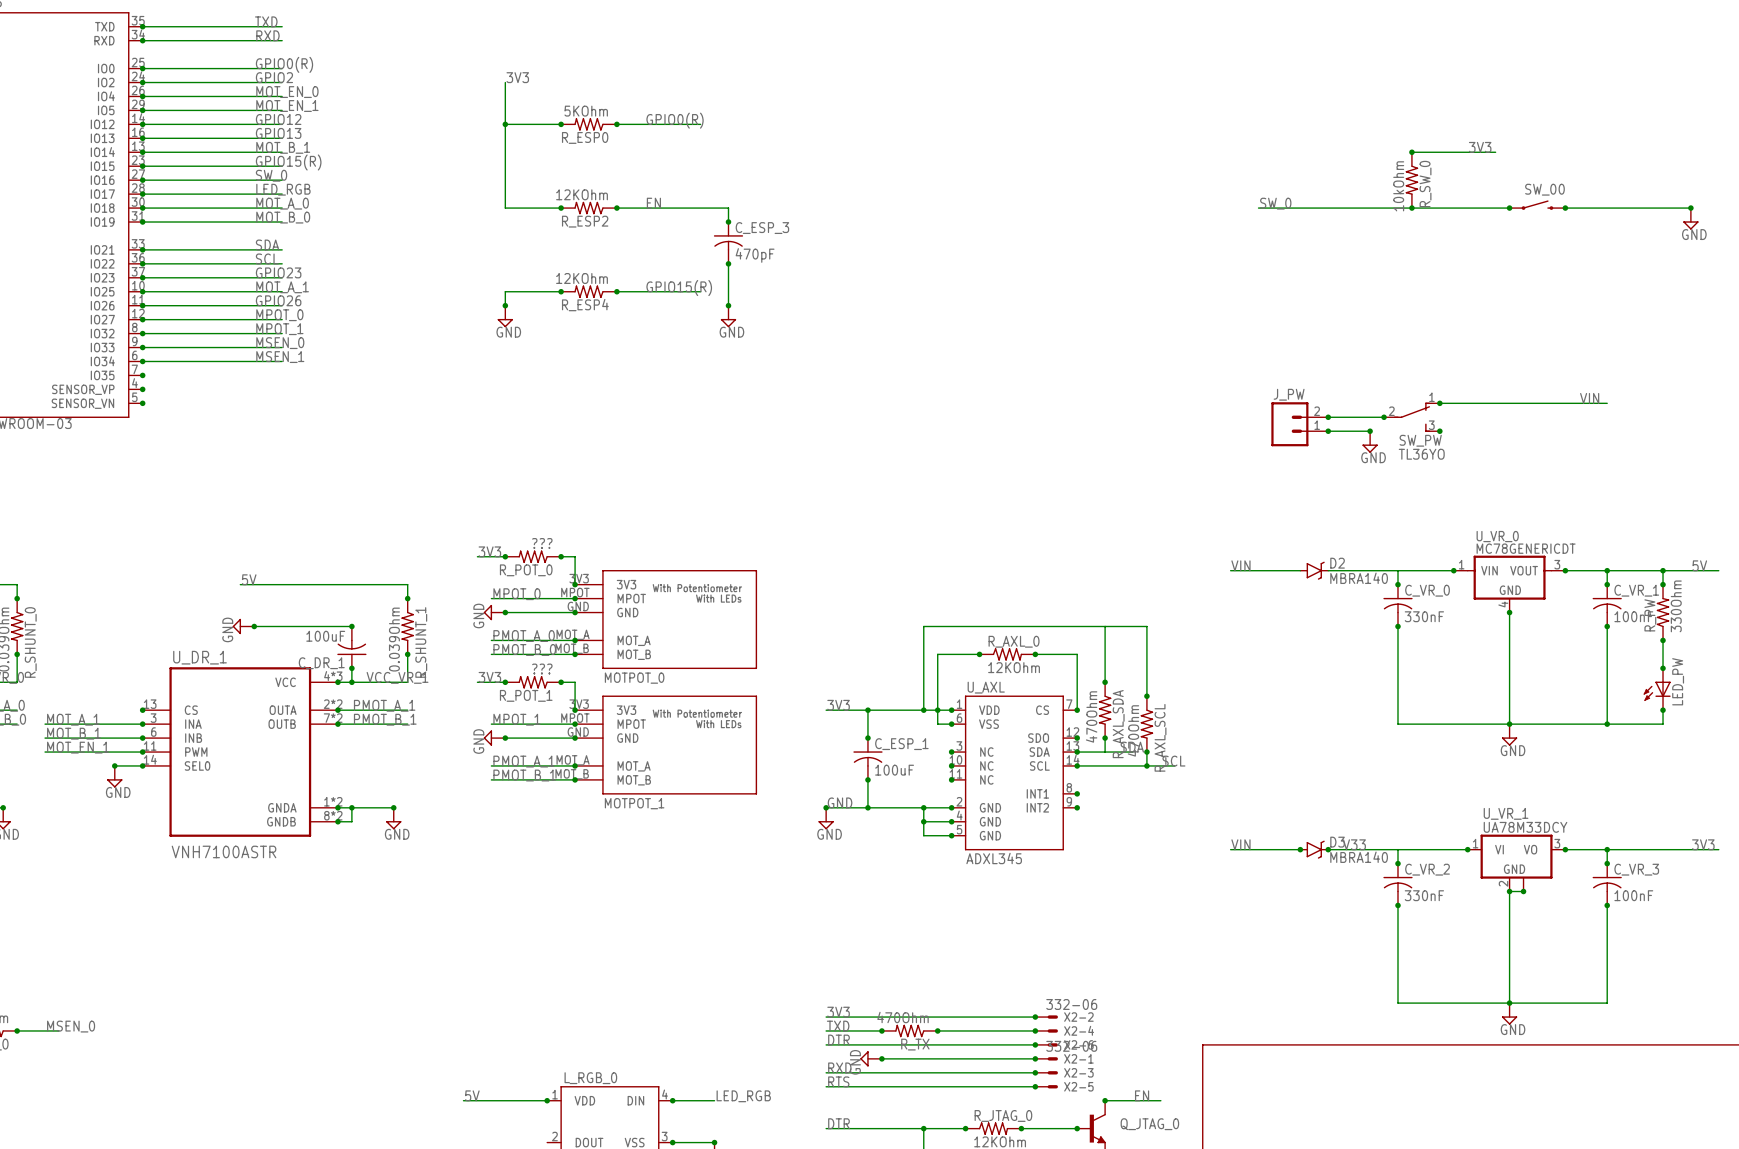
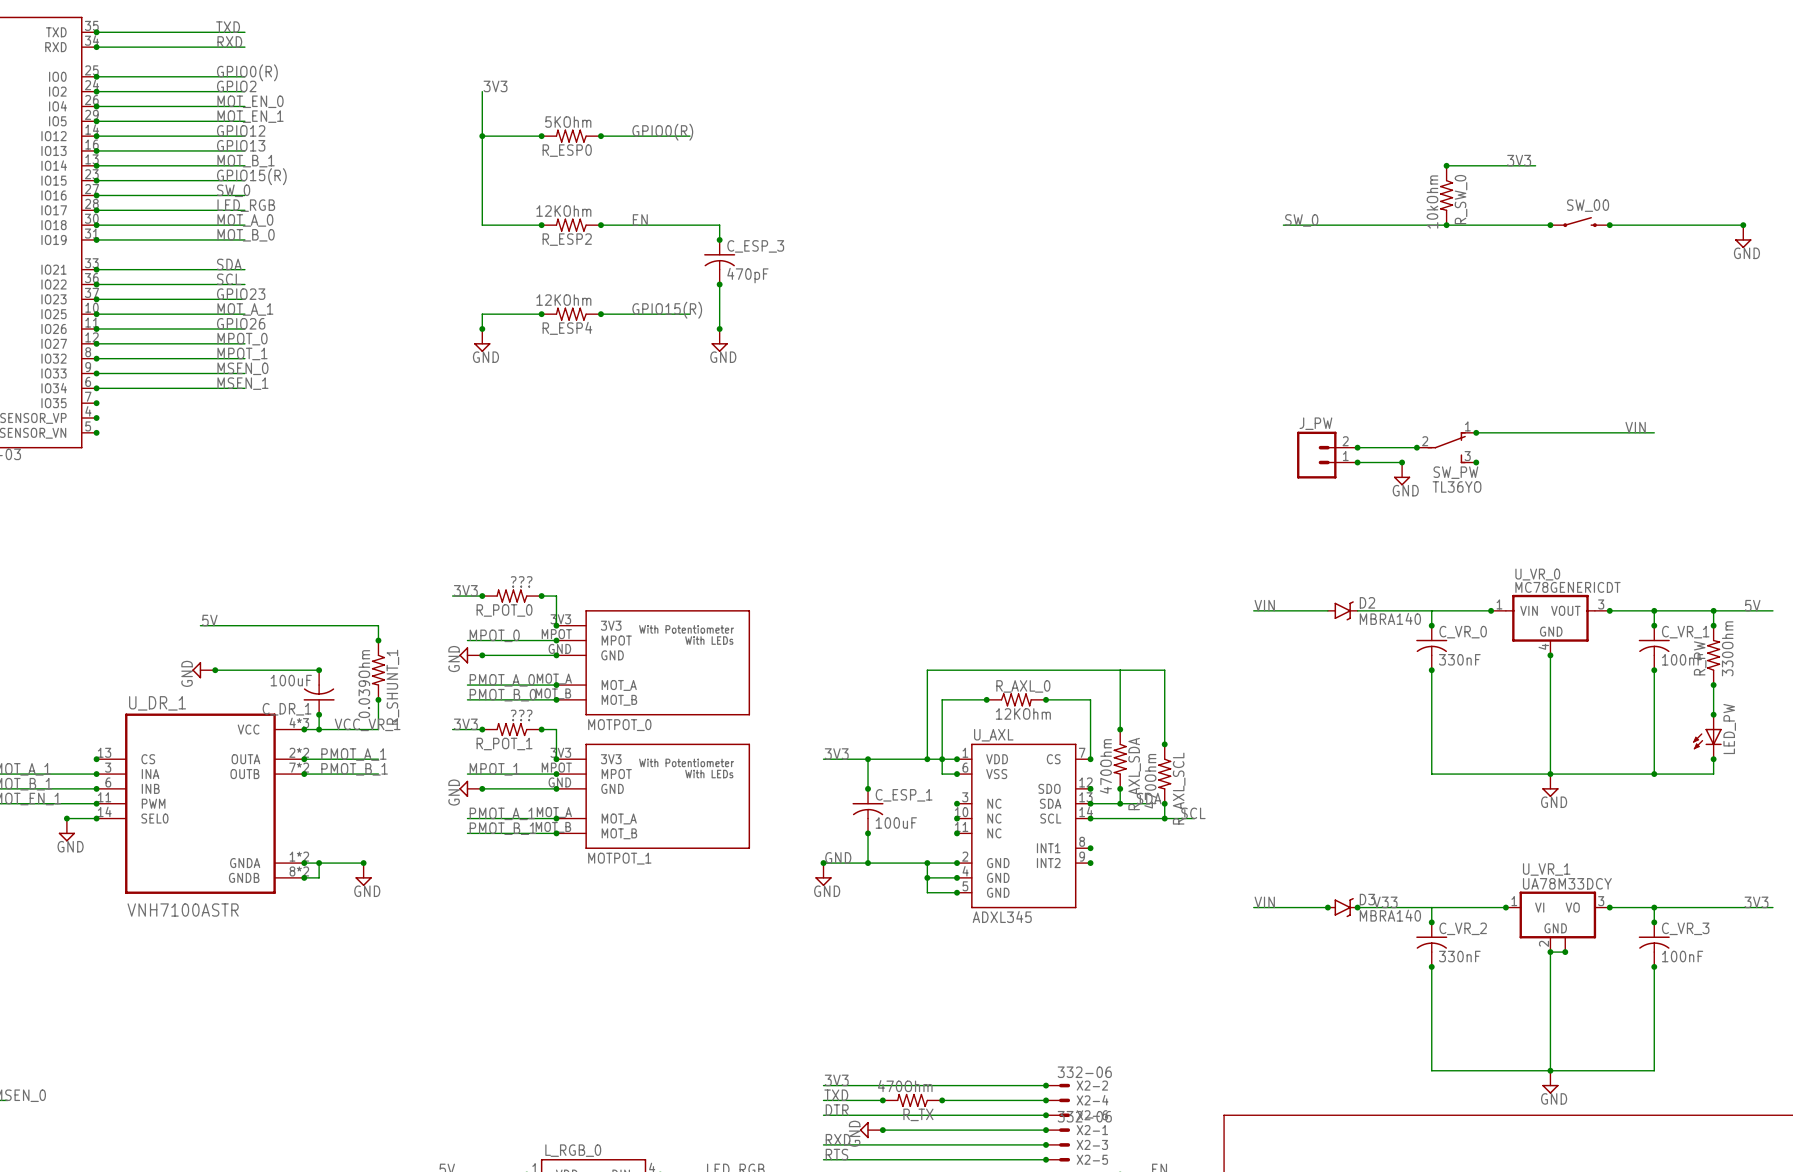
junction: none -> (1120, 803)

